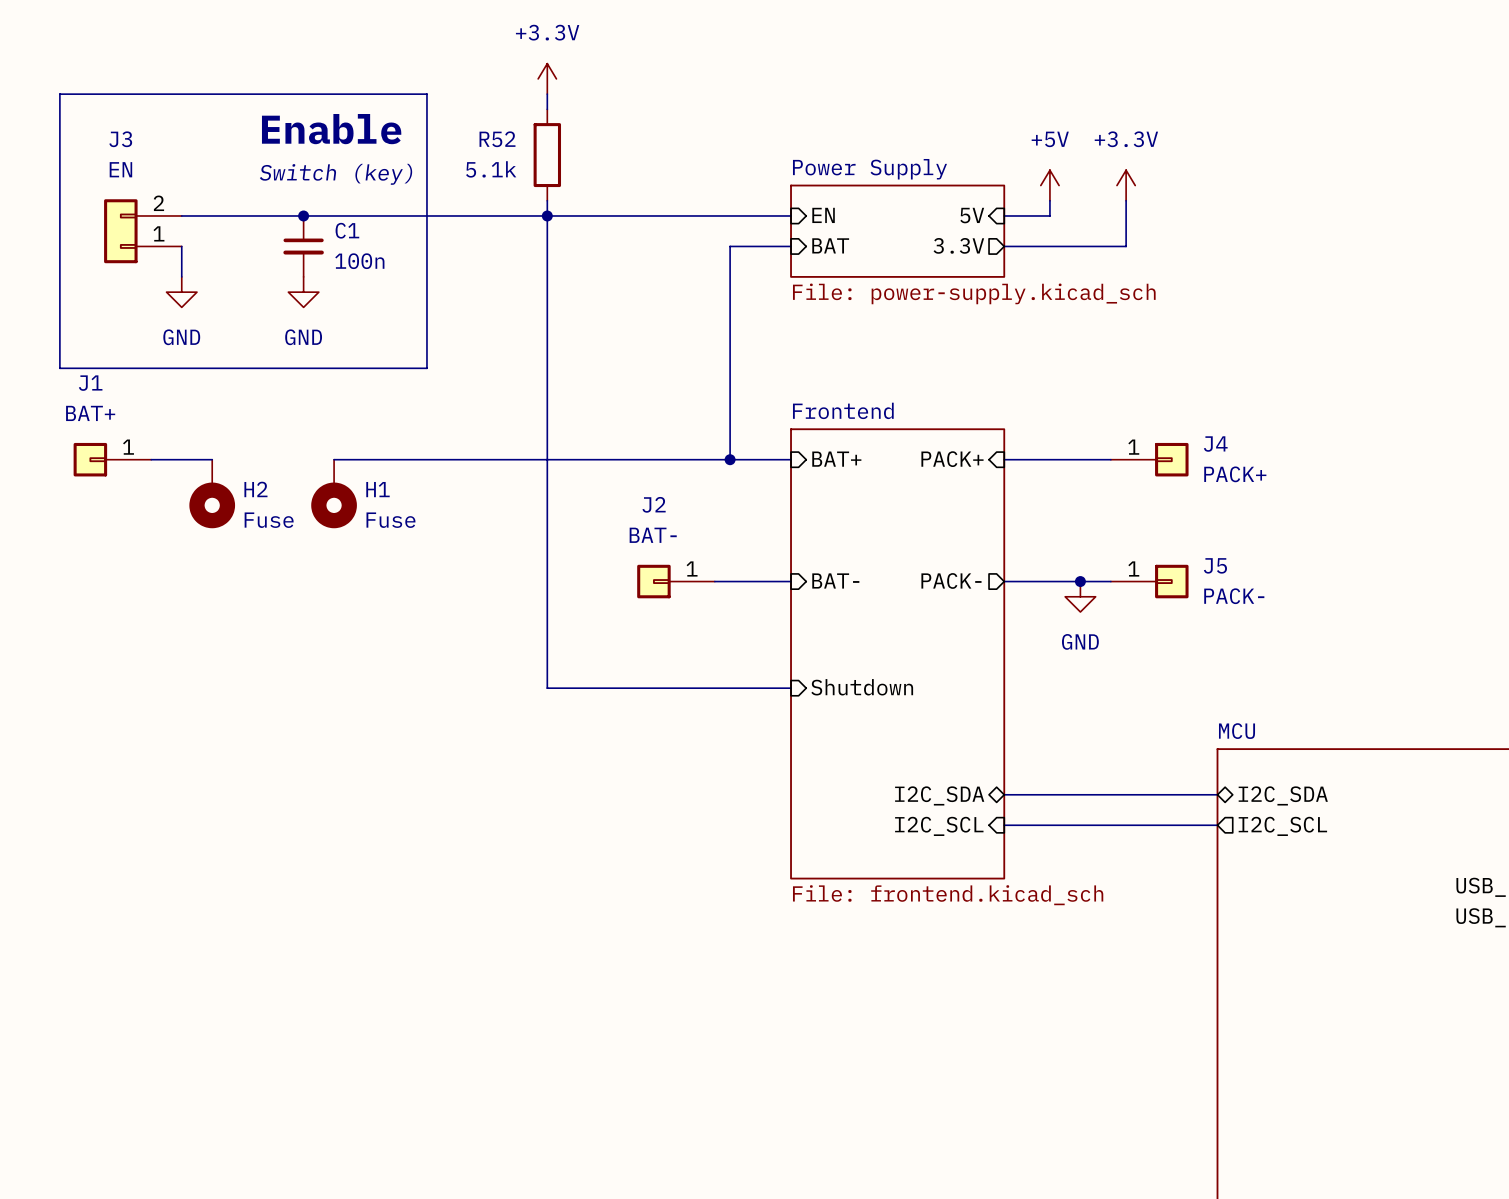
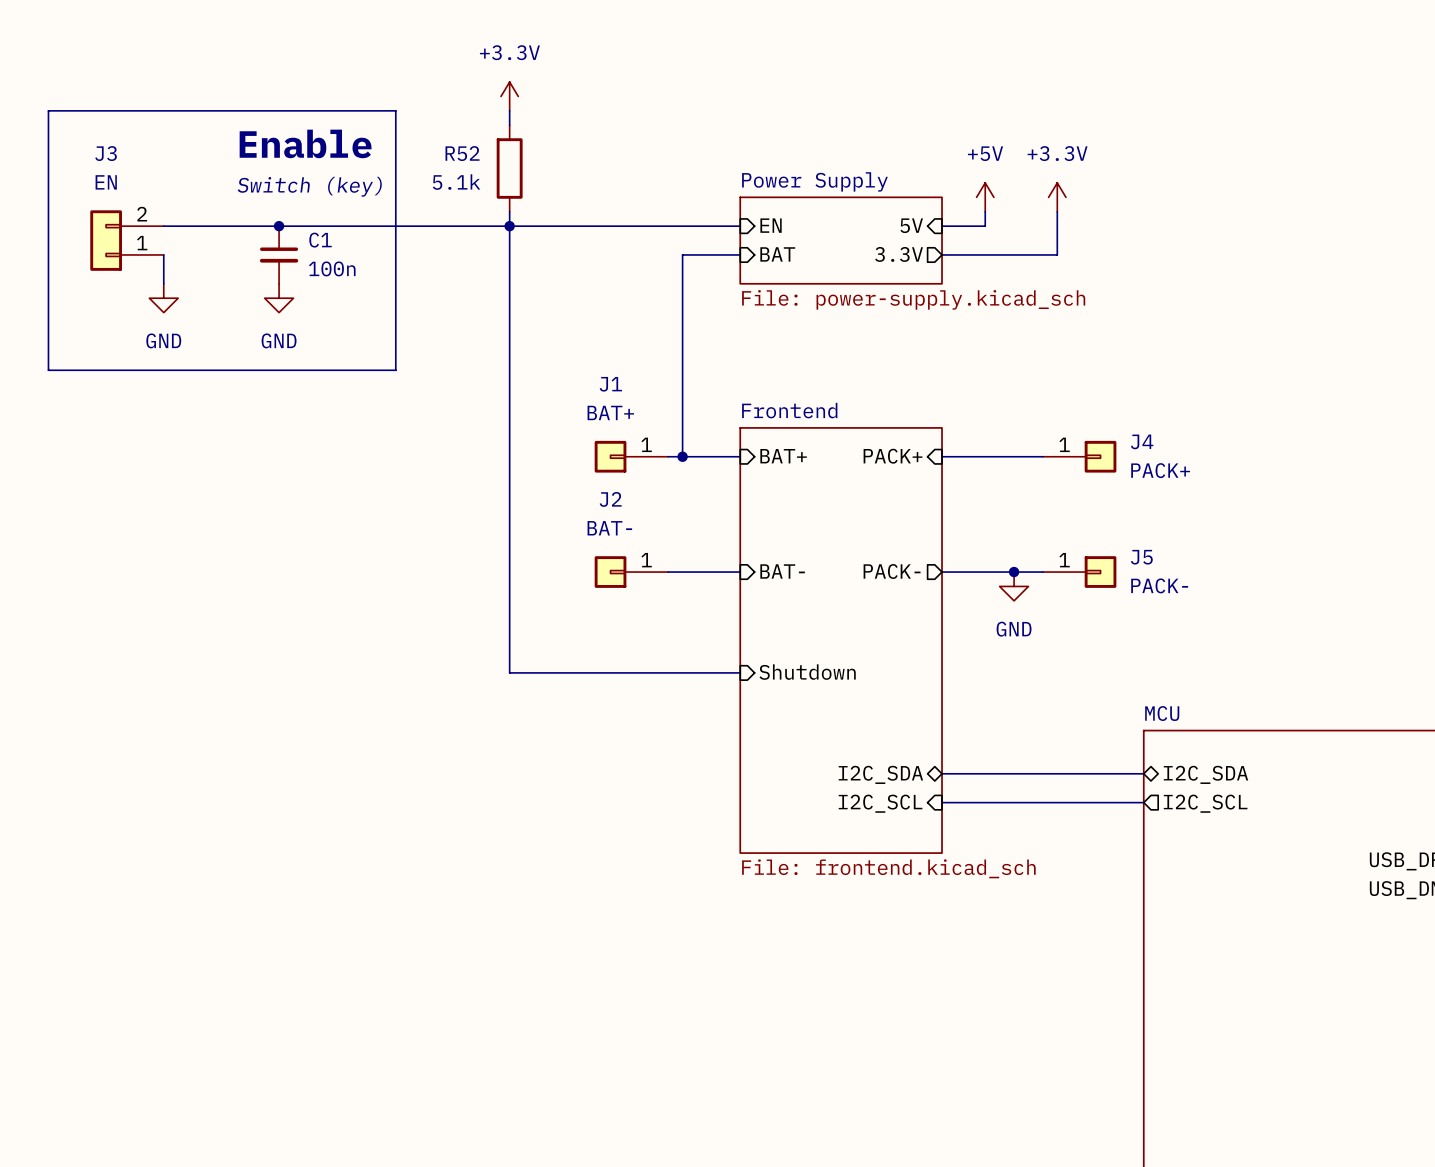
J1 position: (112, 459) -> (631, 456)
wire: (151, 459) (212, 459) -> none
wire: (334, 459) (714, 459) -> none
H2: Fuse (212, 493) -> none
H1: Fuse (334, 493) -> none

